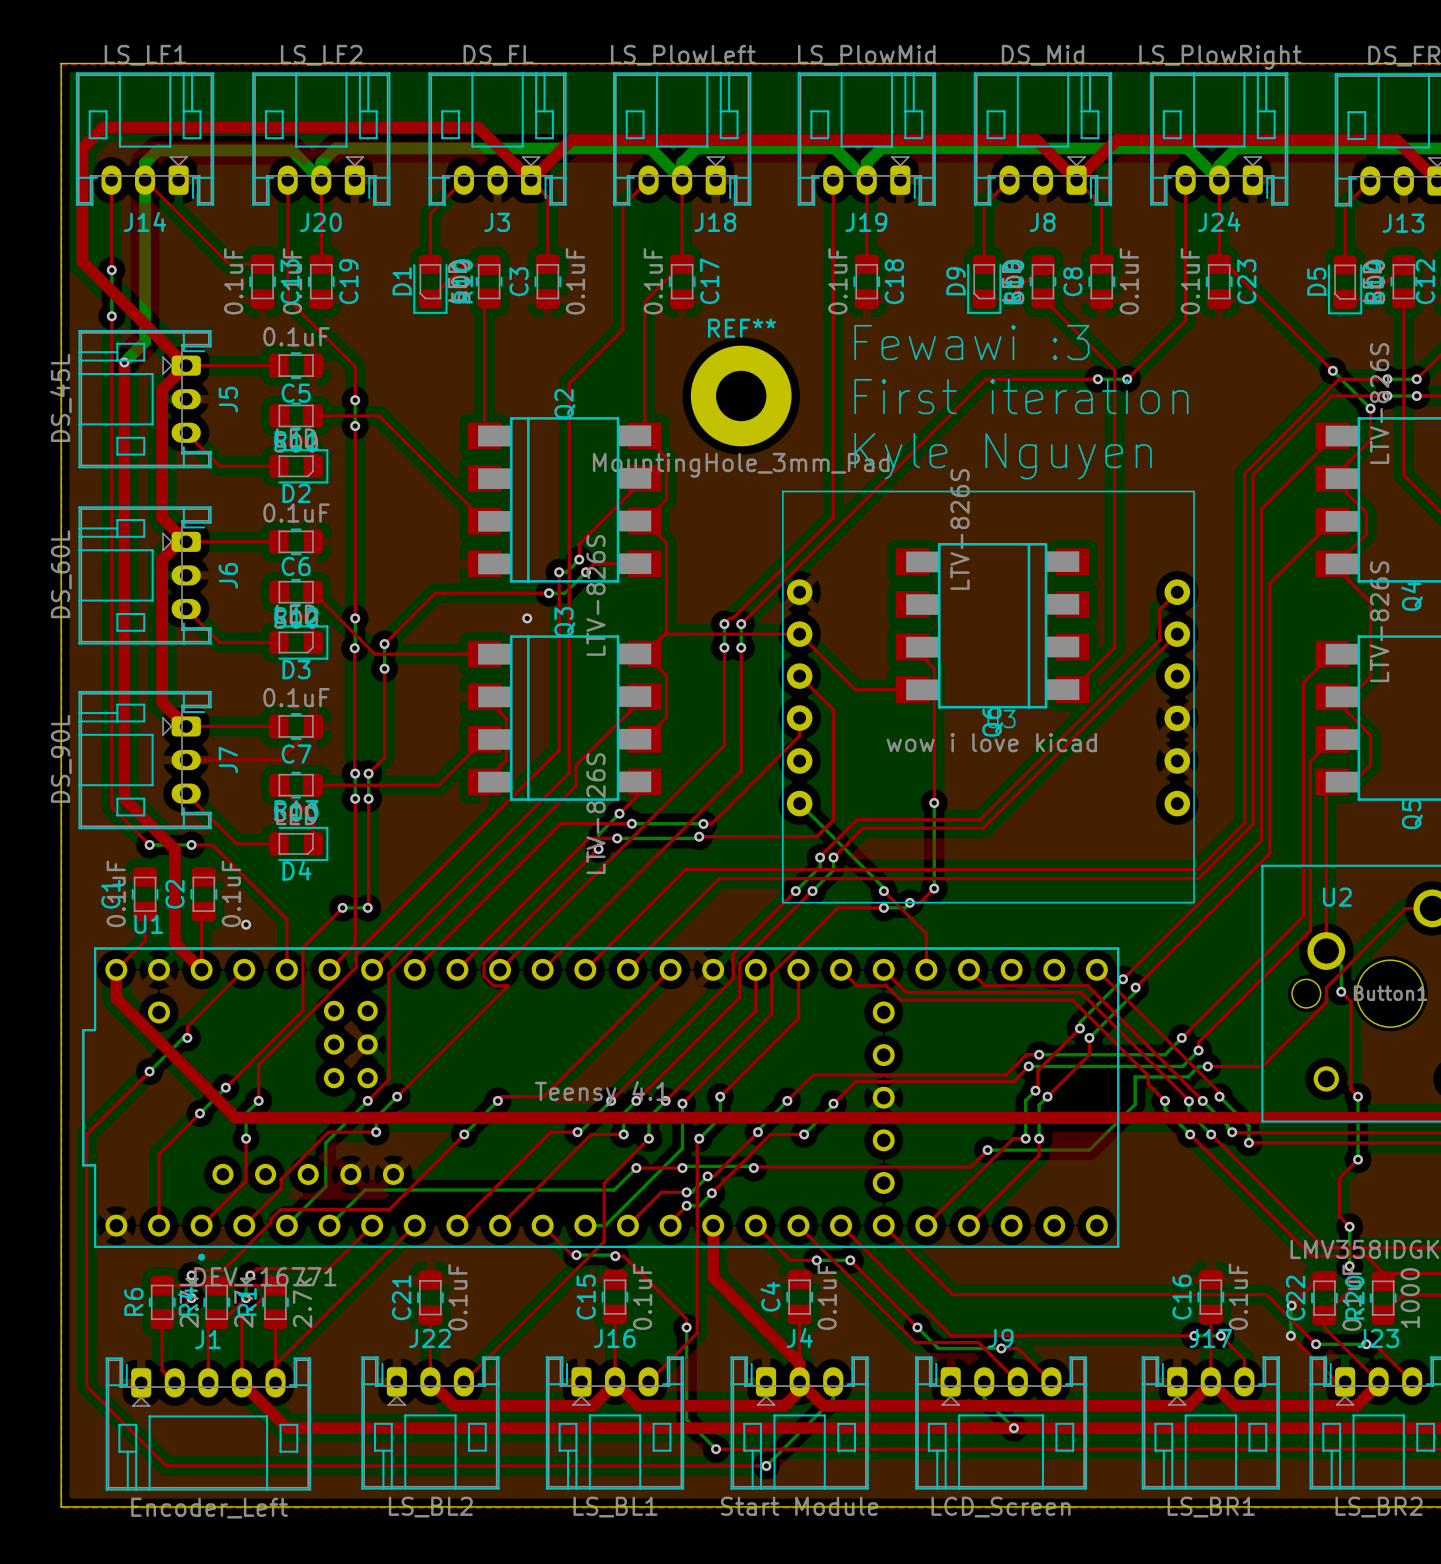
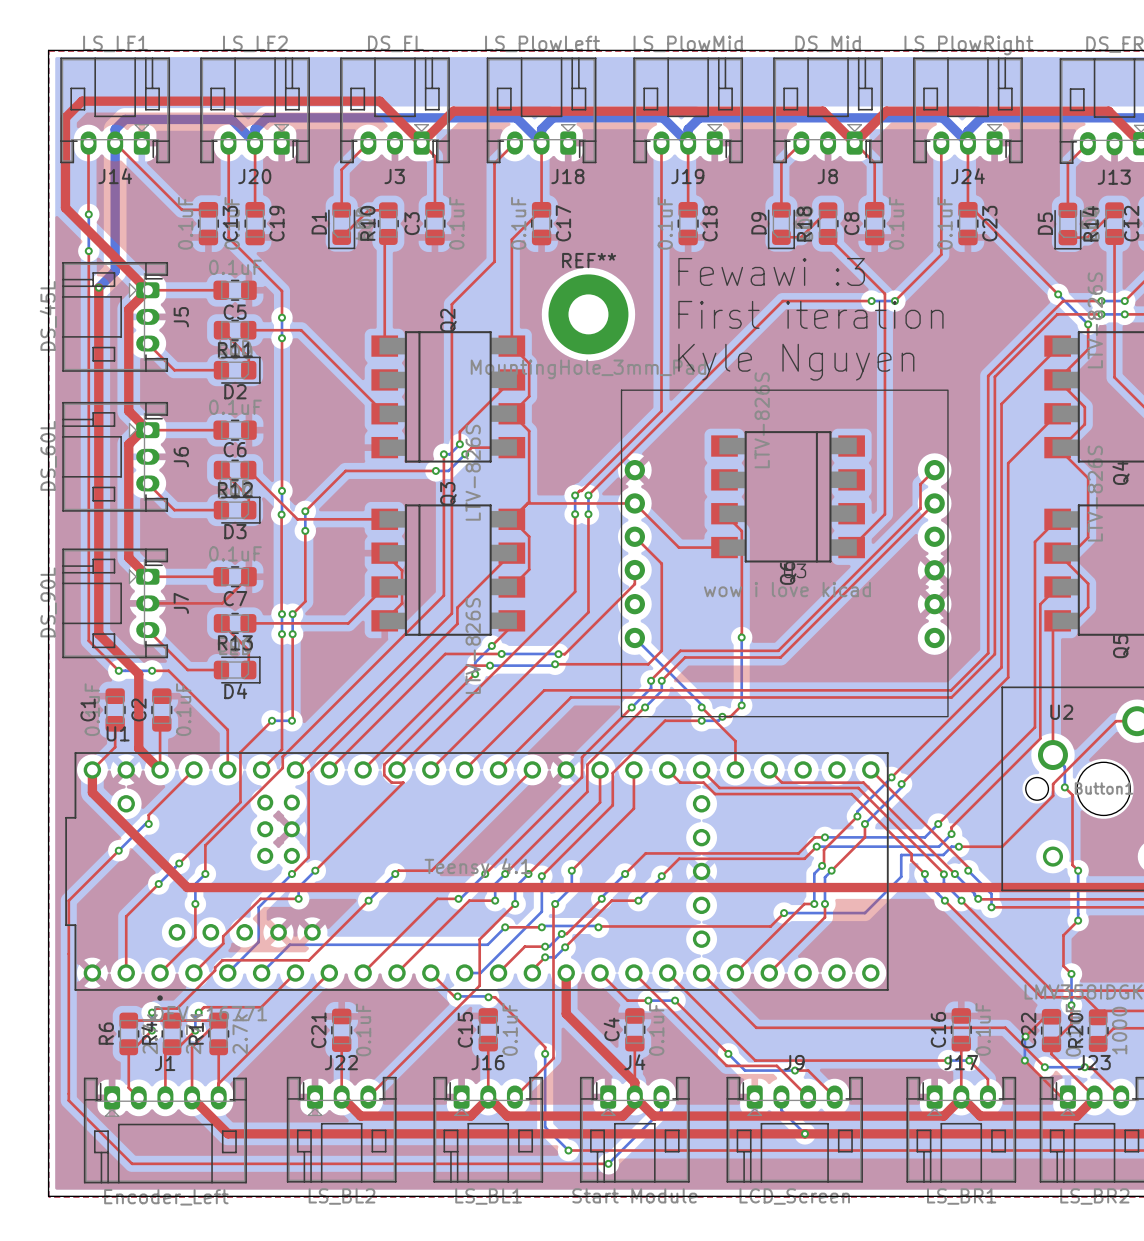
via: (527, 618) -> none
via: (246, 924) -> none

